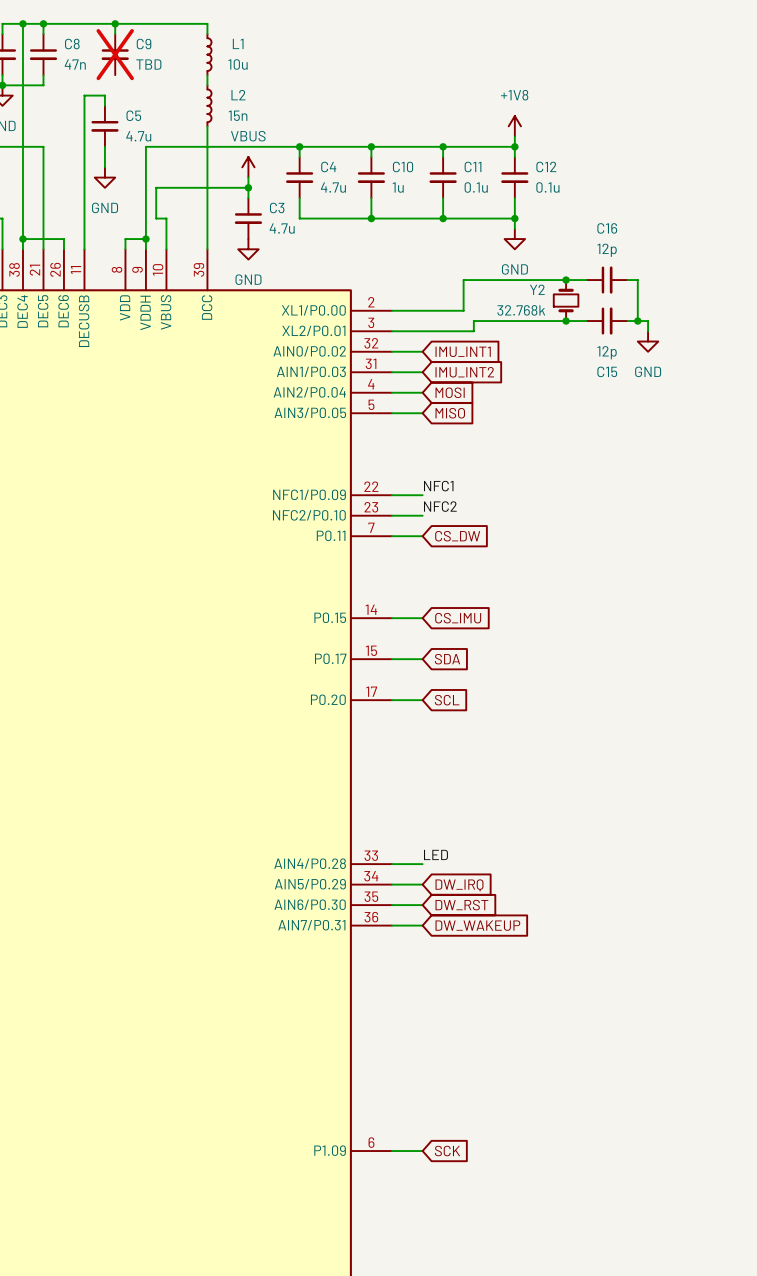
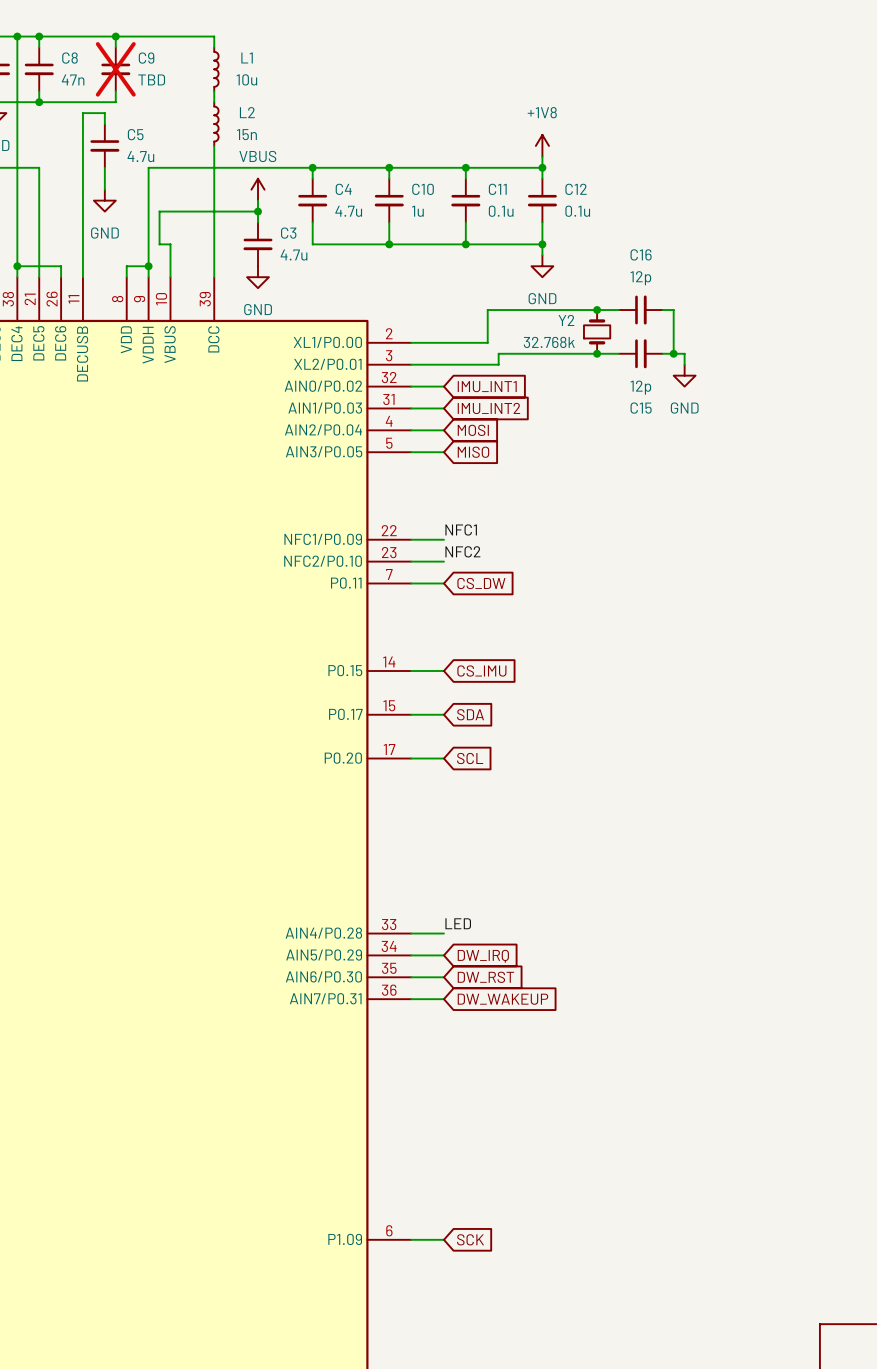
wire: none -> (115, 91) (115, 102) (39, 102)
junction: none -> (39, 102)

